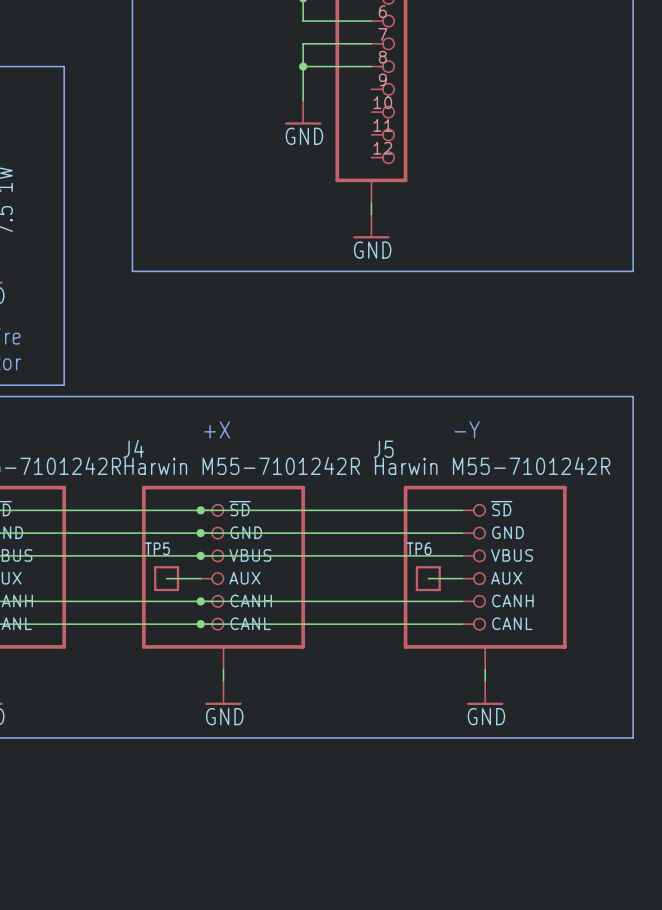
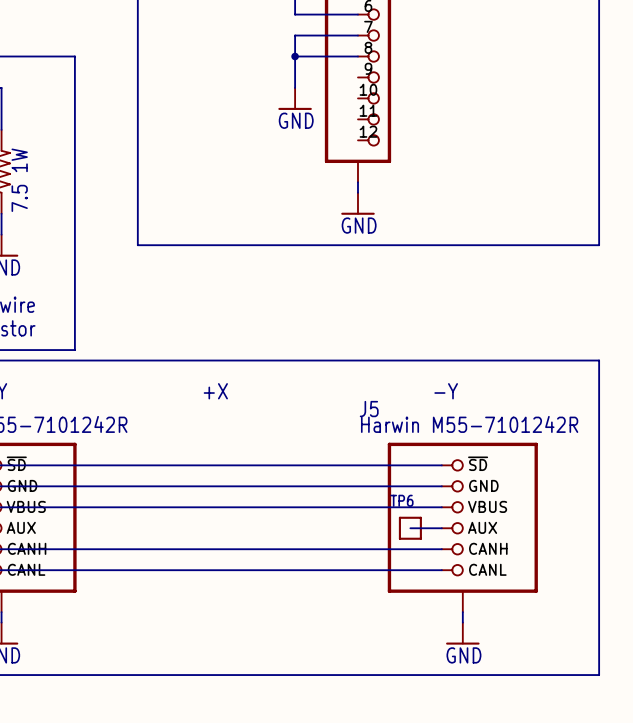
junction: (200, 510) -> none
junction: (200, 533) -> none
junction: (200, 555) -> none
J4: Harwin M55-7101242R (223, 577) -> none
wire: (166, 578) (200, 578) -> none
TP5: (166, 578) -> none
junction: (200, 601) -> none
junction: (200, 624) -> none
wire: (223, 669) (223, 681) -> none
power symbol: GND (223, 692) -> none

